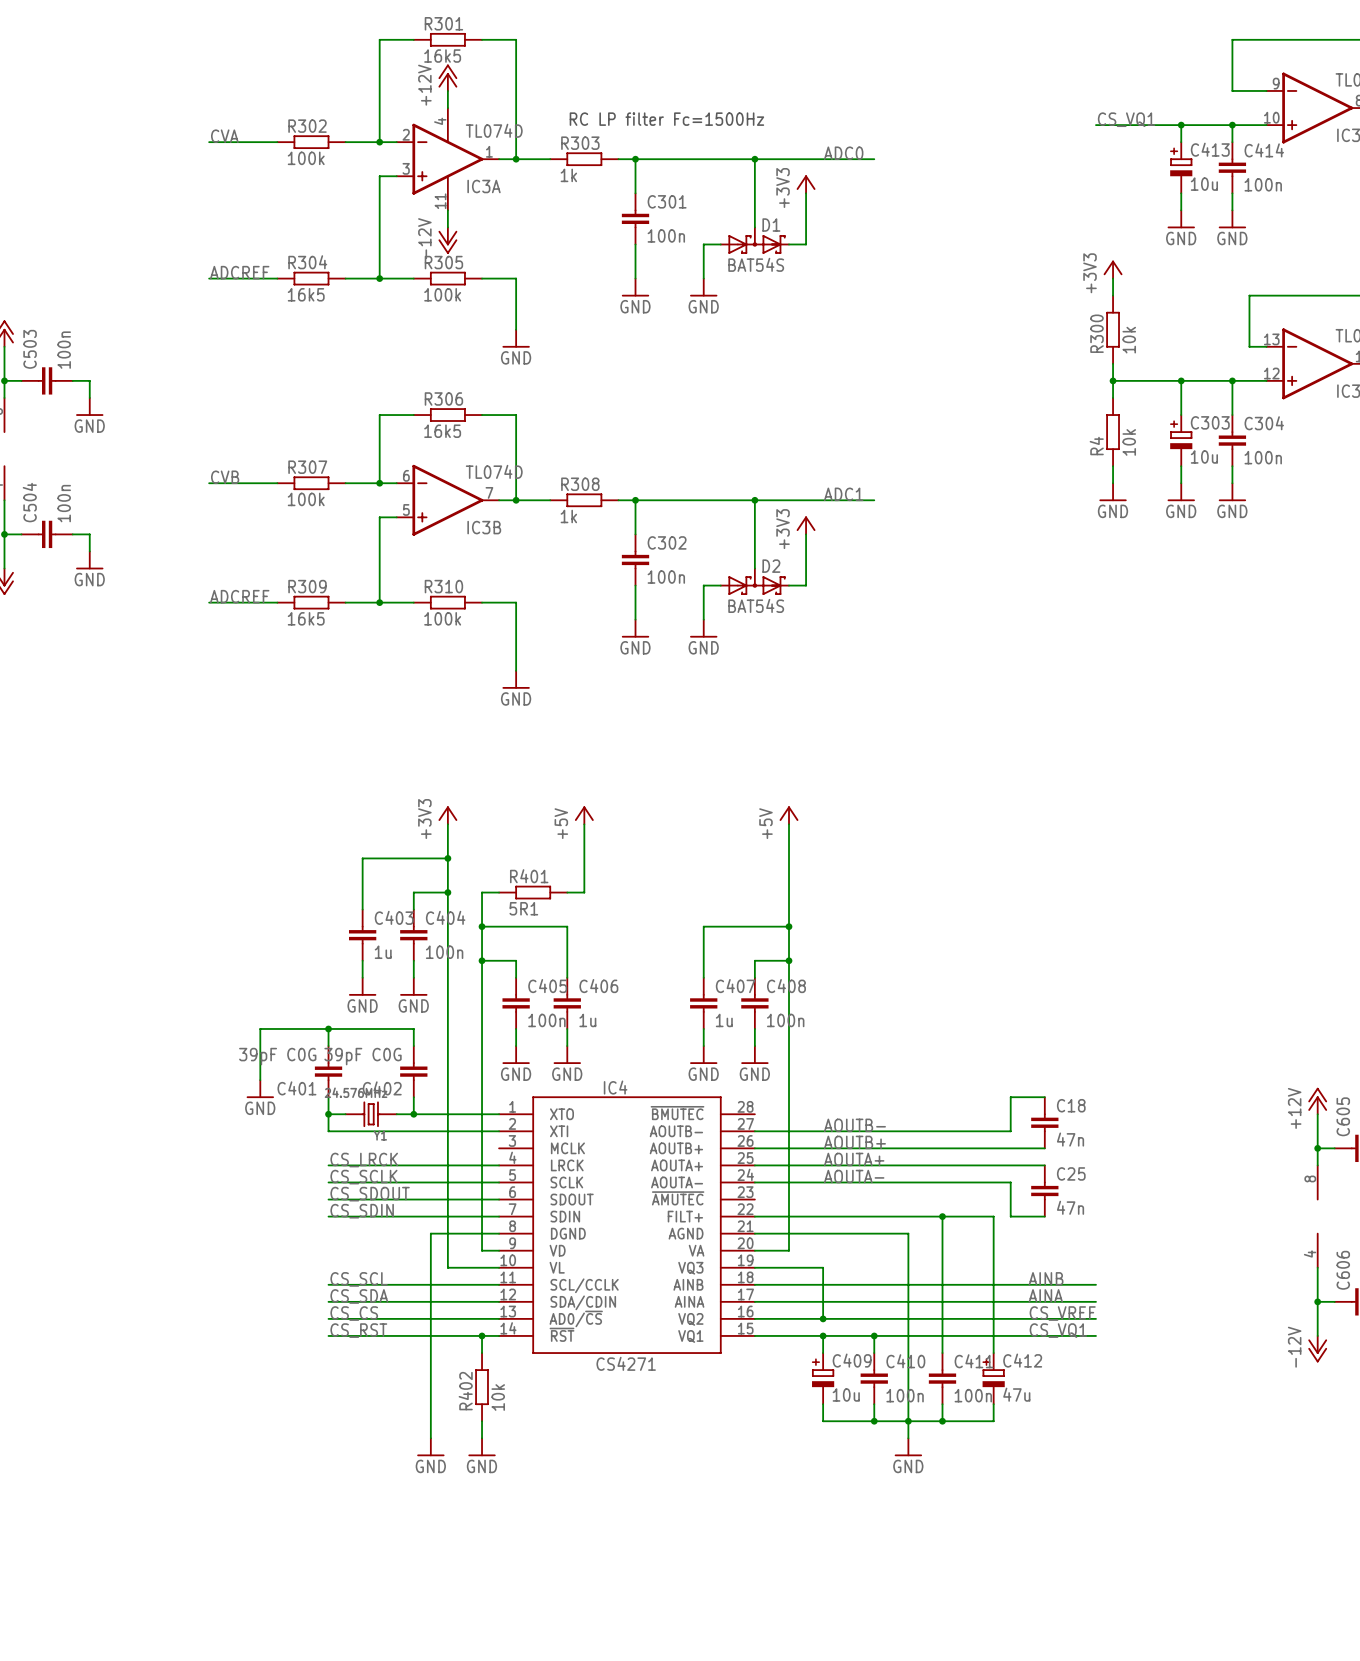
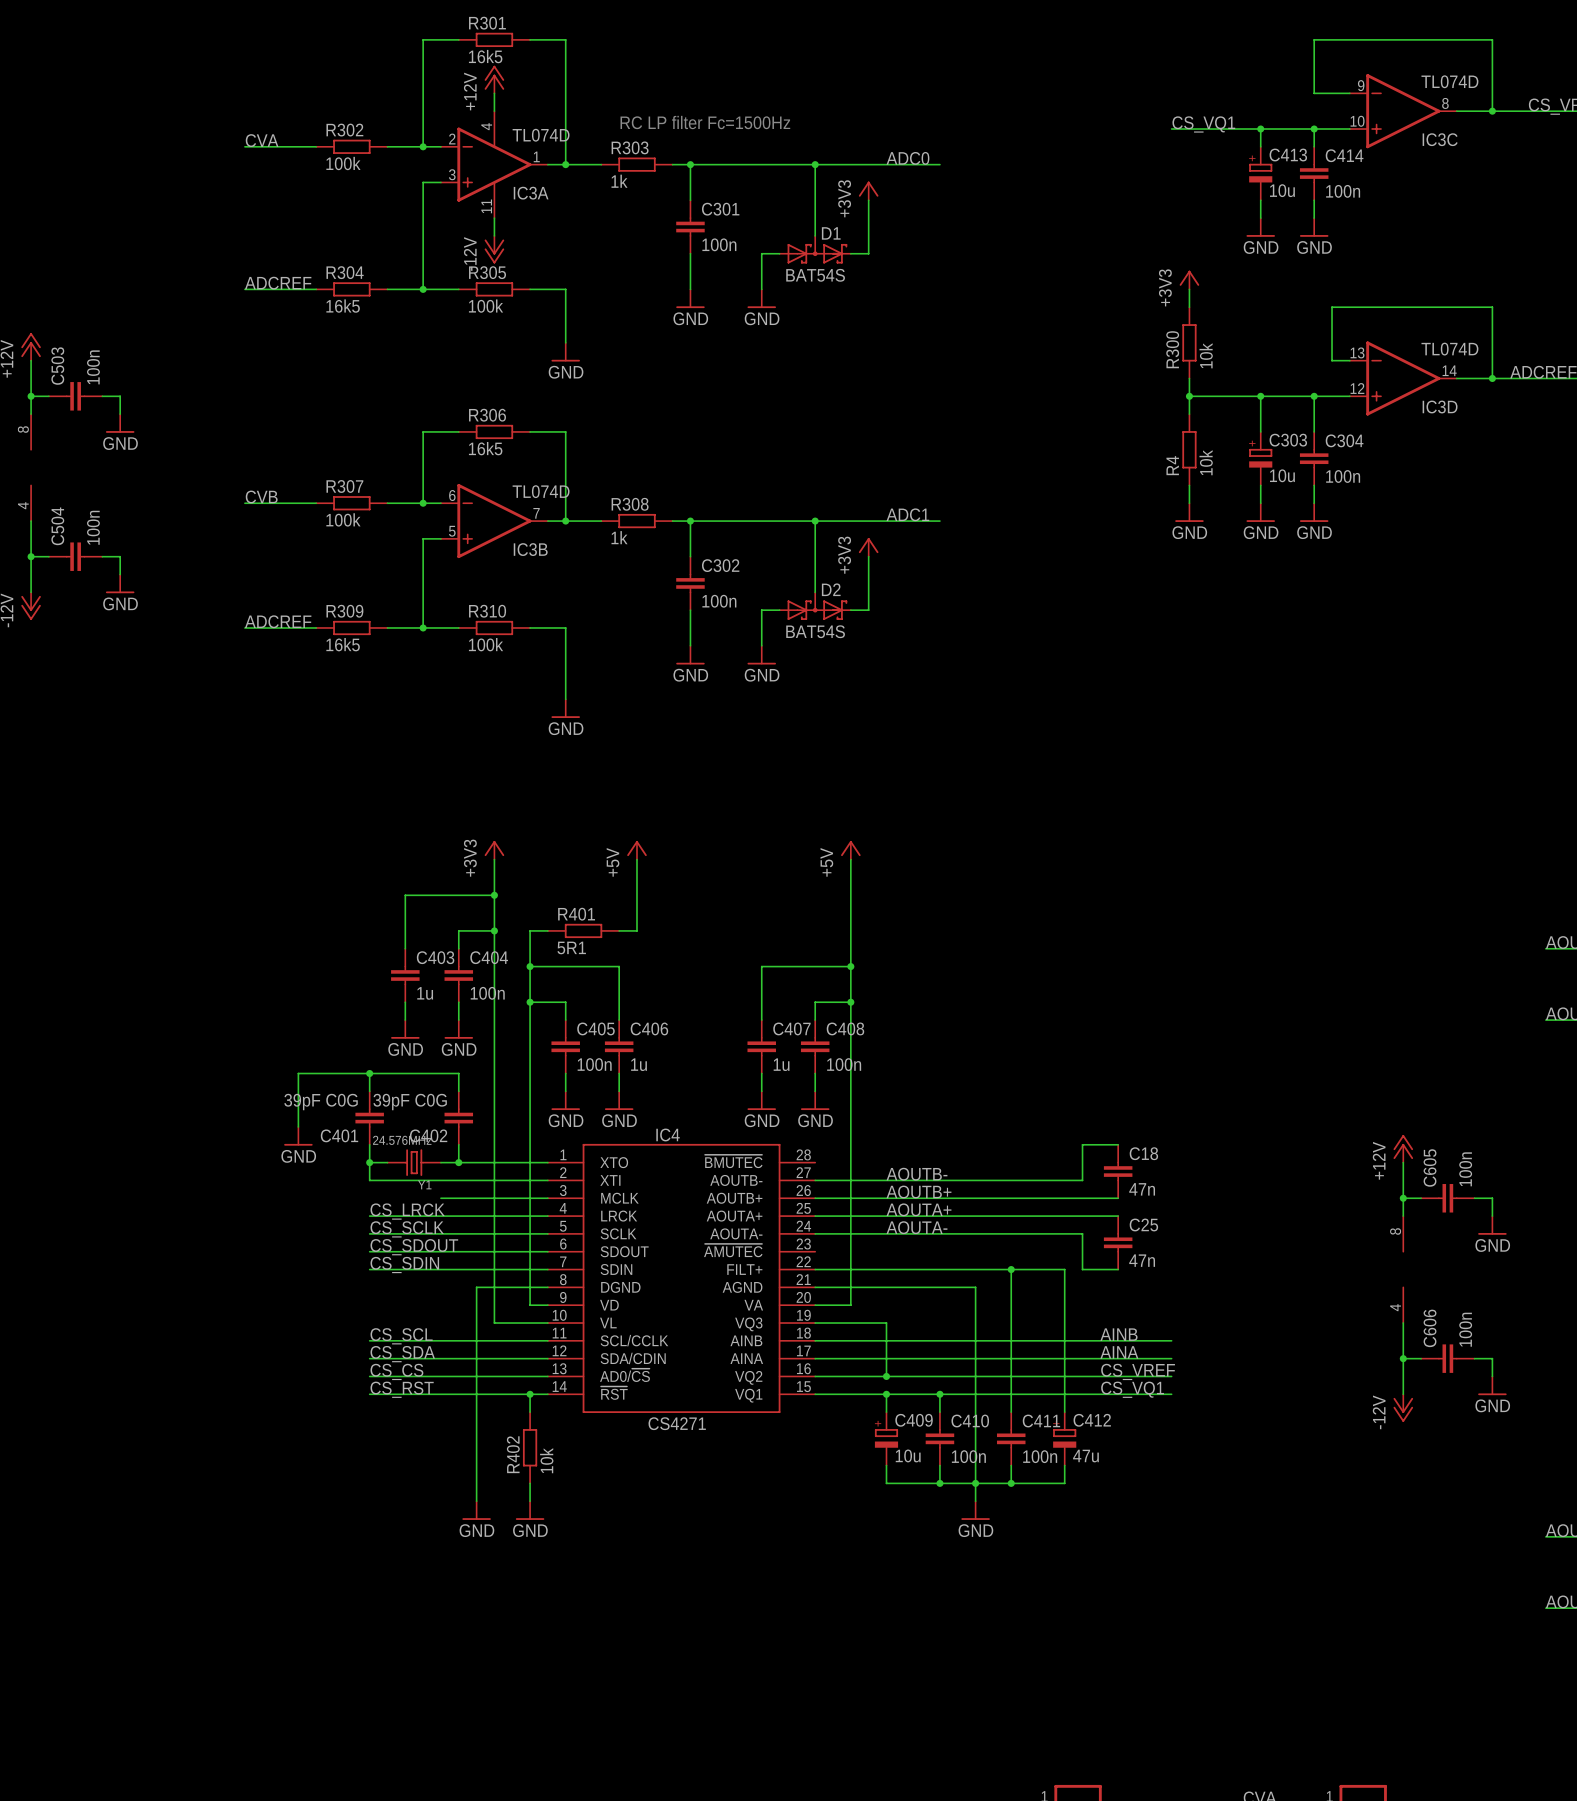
wire: none -> (440, 1198) (547, 1198)

